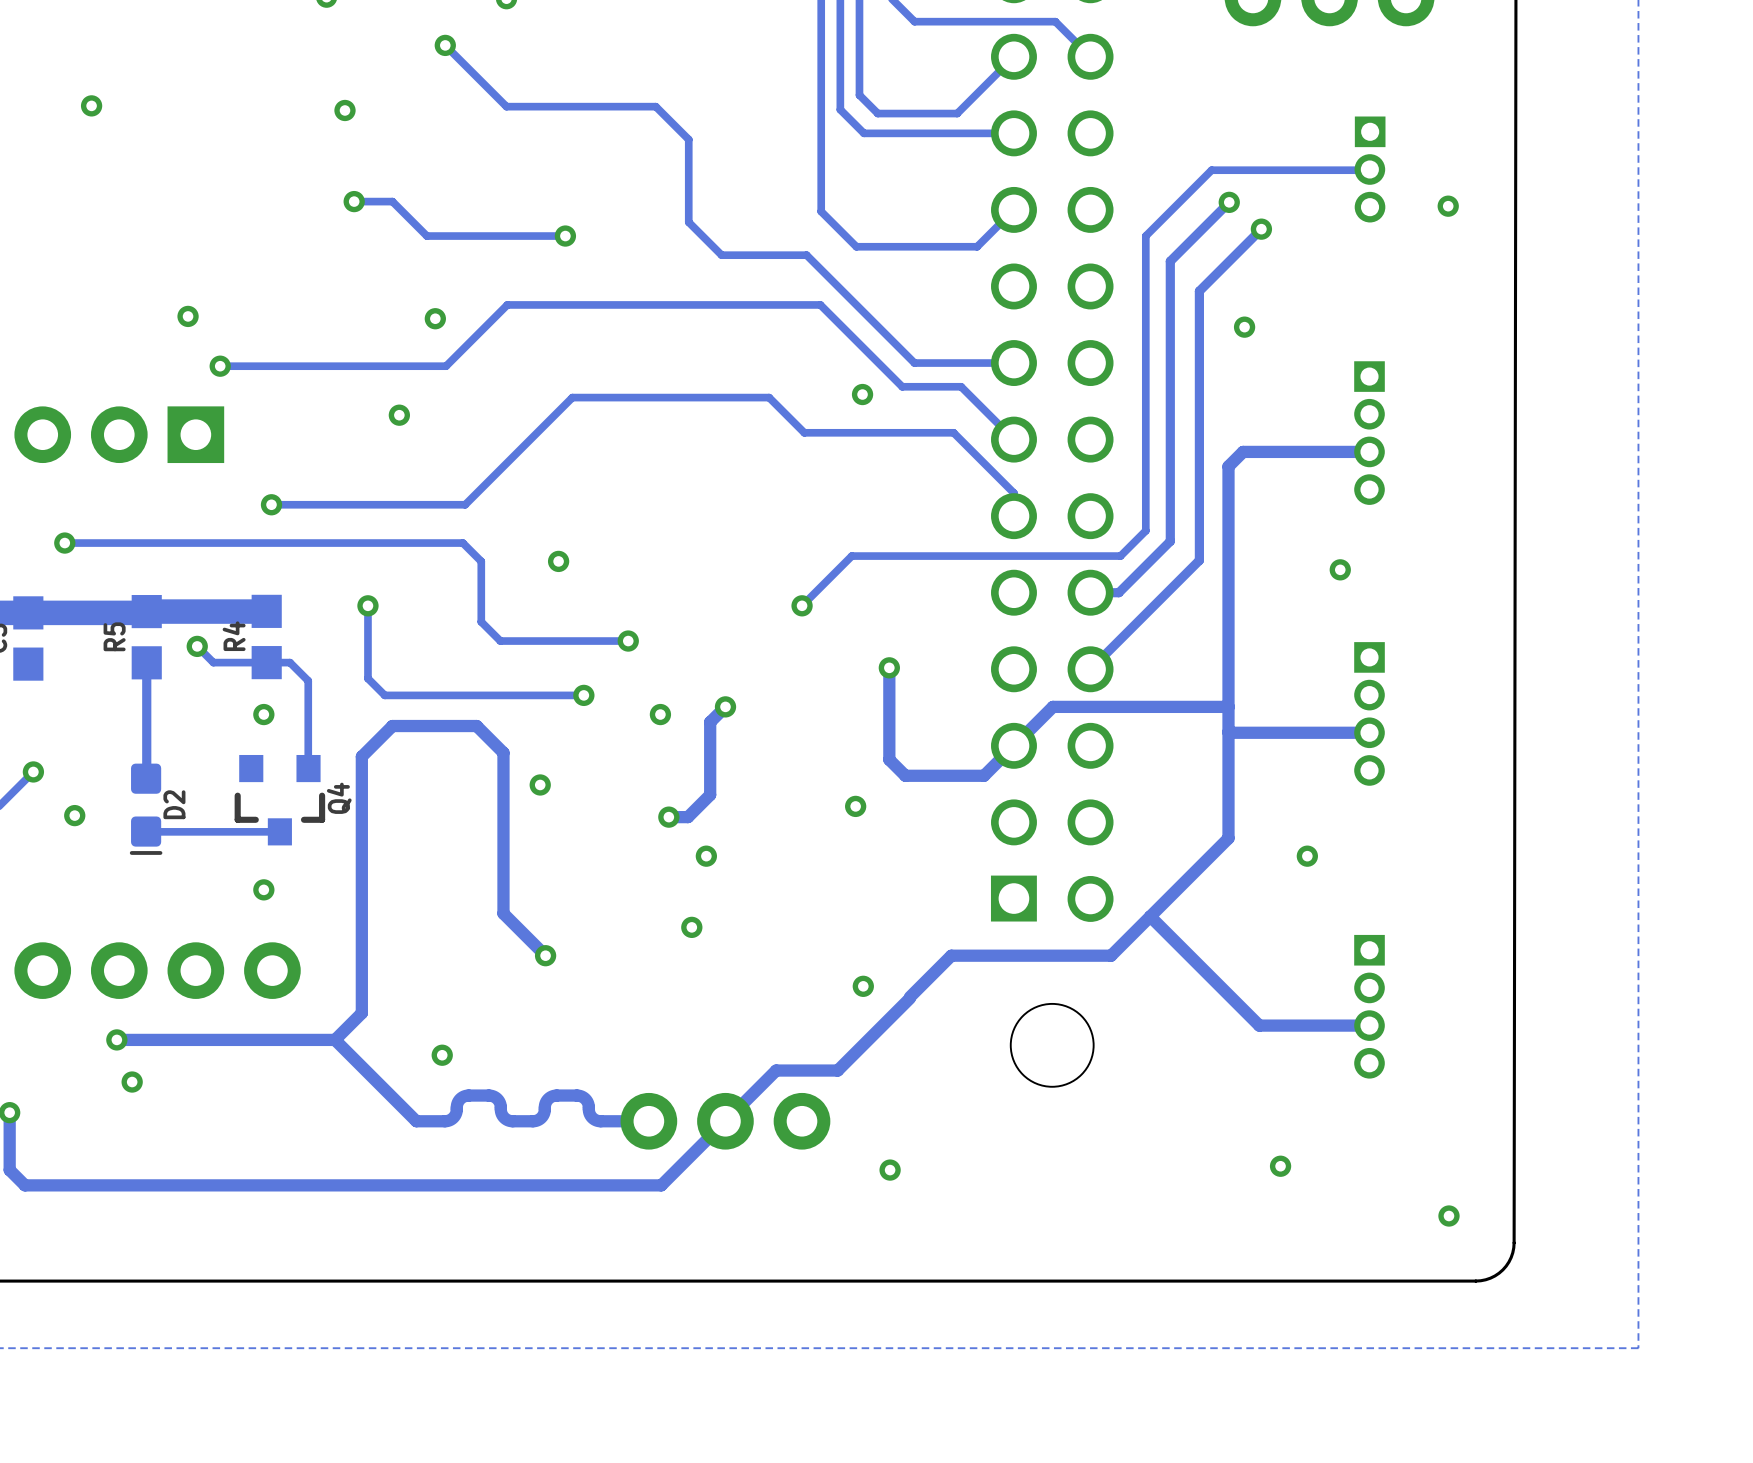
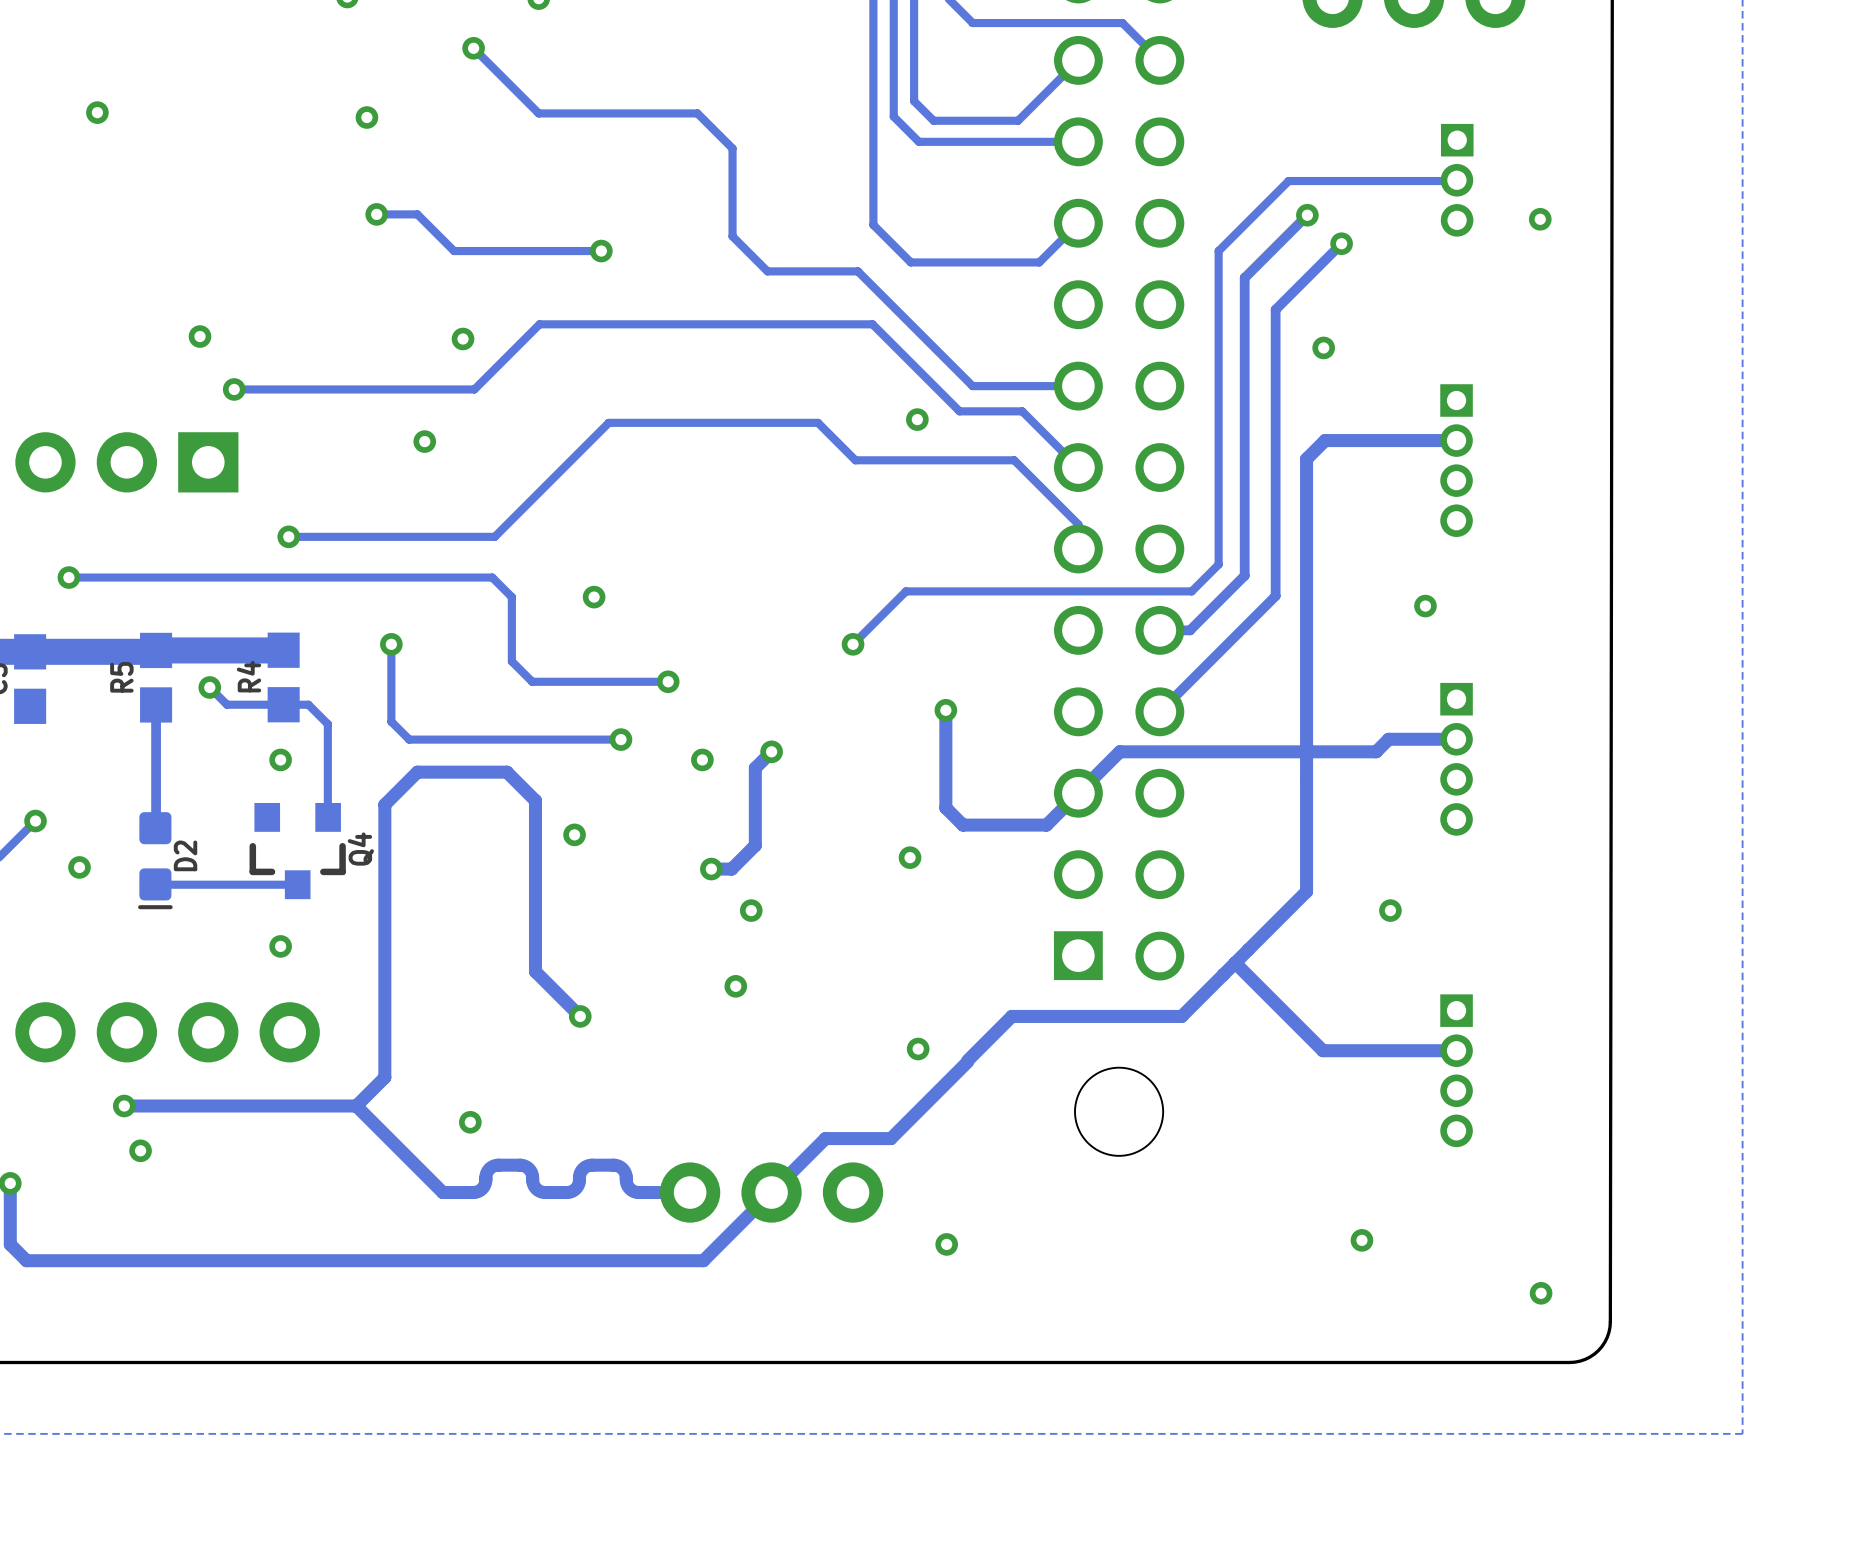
track: (1369, 451) (1243, 451) (1228, 466) -> (1456, 440) (1325, 440) (1306, 459) (1306, 496)
track: none -> (1456, 739) (1388, 739) (1376, 751) (1306, 751)
track: (1228, 732) (1369, 732) -> none
track: none -> (1235, 962) (1322, 1050) (1456, 1050)
track: (1150, 916) (1259, 1025) (1369, 1025) -> none

